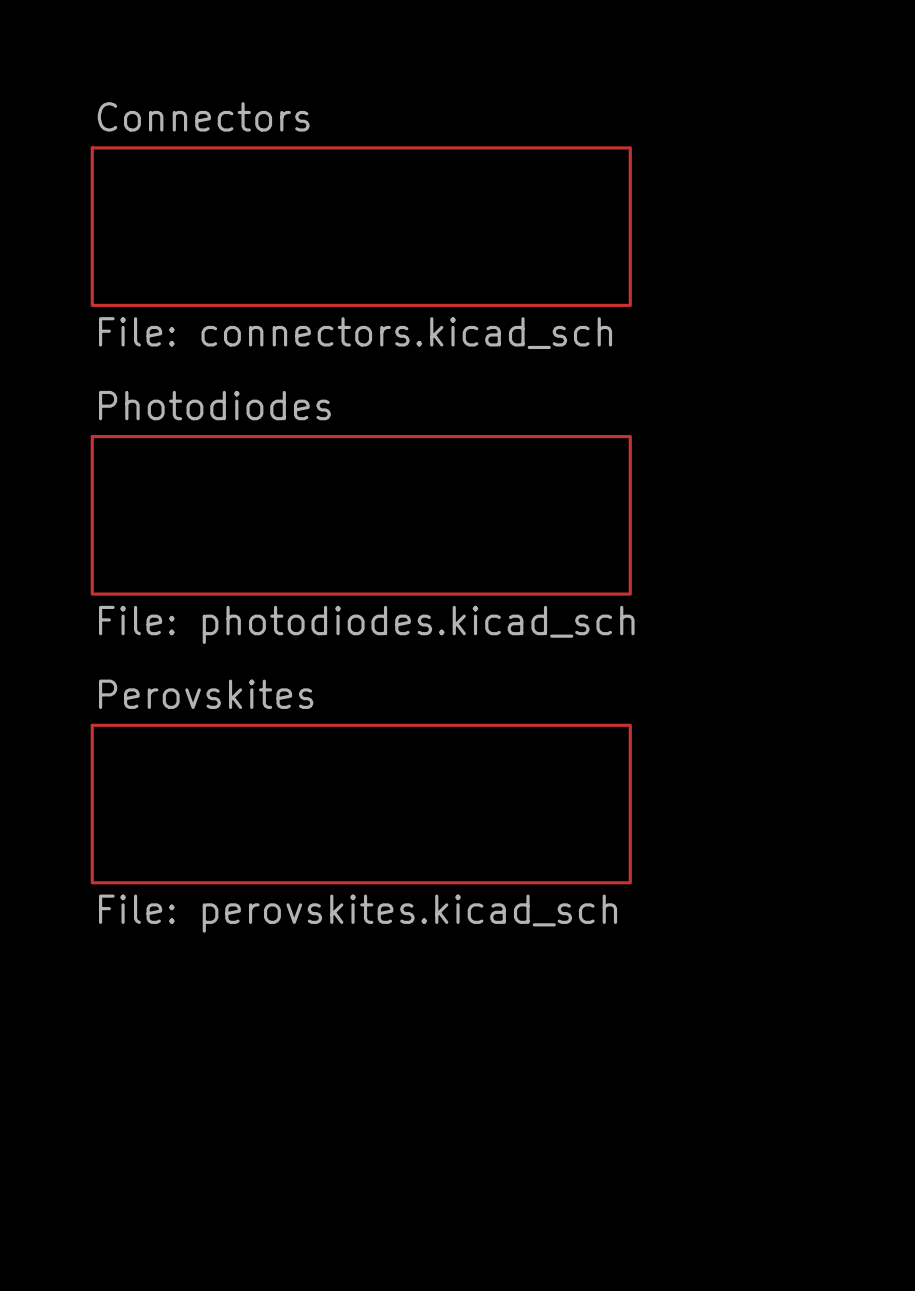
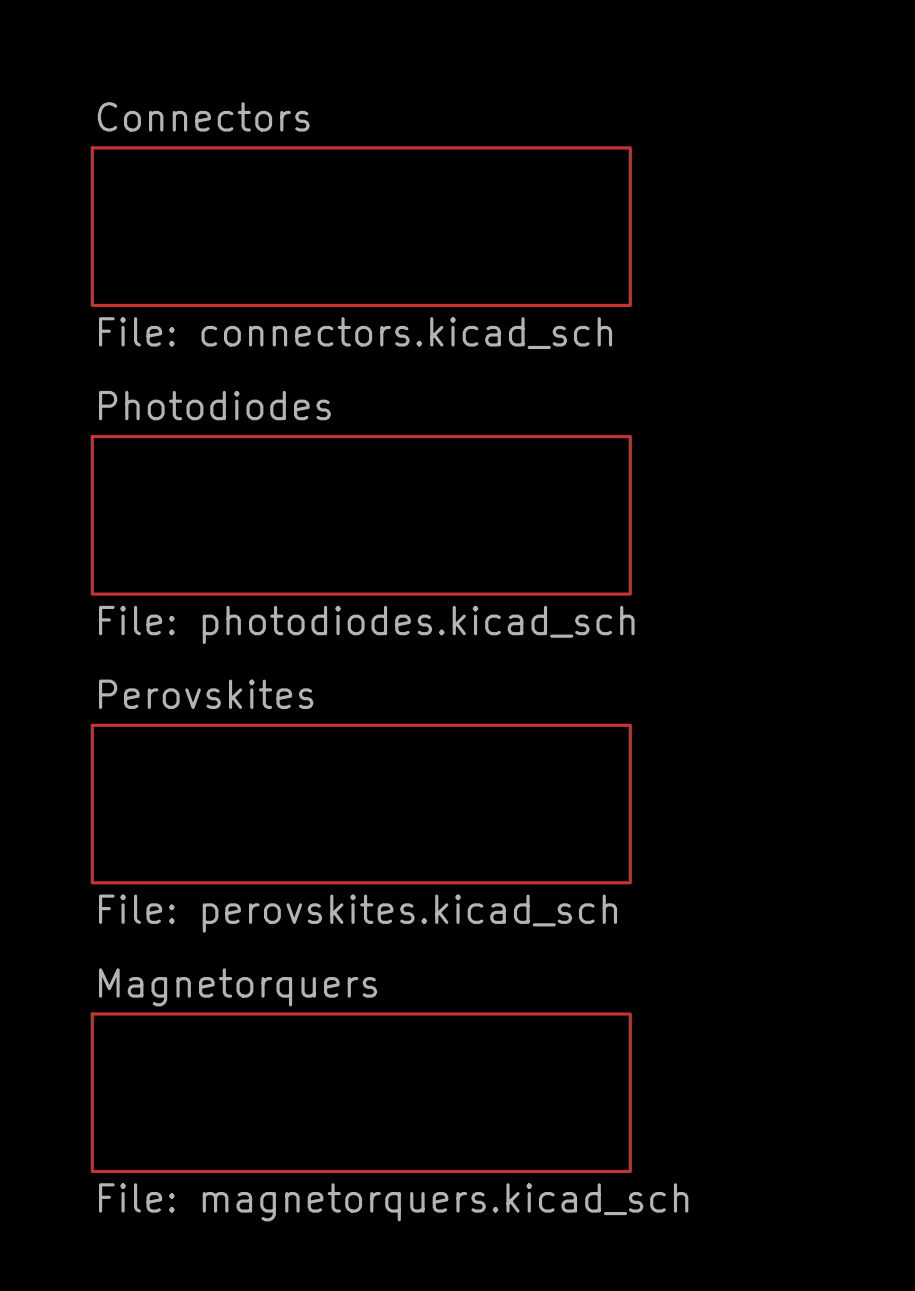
sheet Magnetorquers: none -> File: magnetorquers.kicad_sch (361, 1092)

